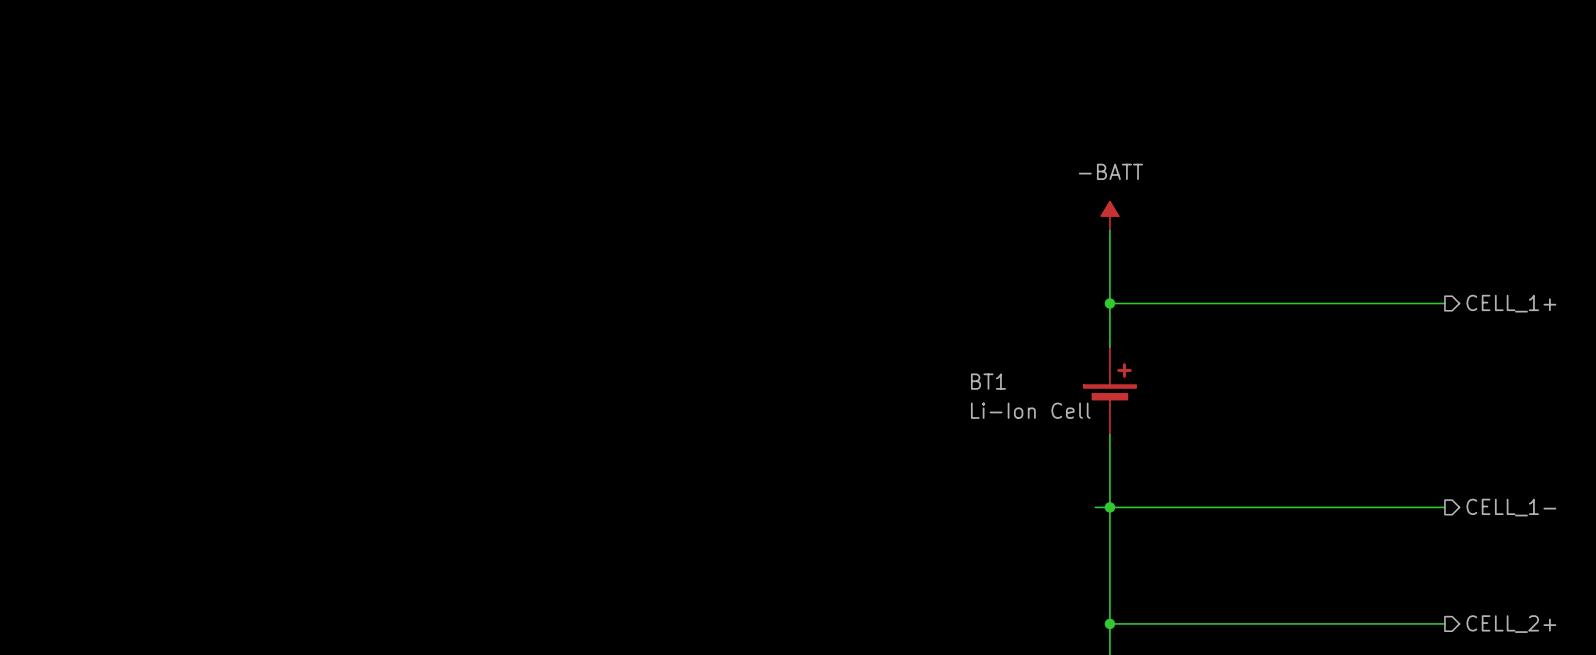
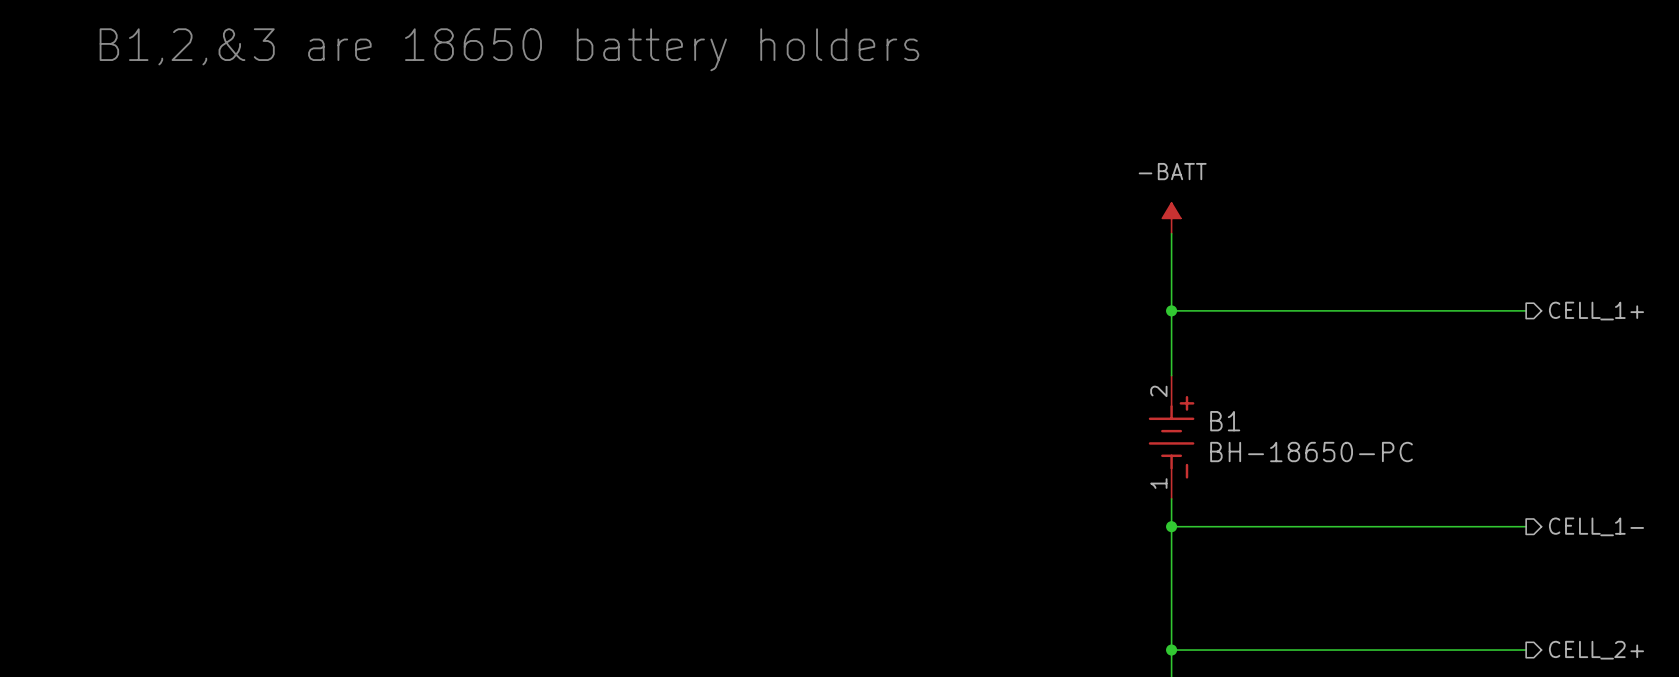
text: none -> B1,2,&3 are 18650 battery holders (509, 49)
BT1: Li-Ion Cell (1109, 390) -> none
B1: none -> BH-18650-PC (1171, 437)
wire: (1095, 507) (1109, 507) -> none

